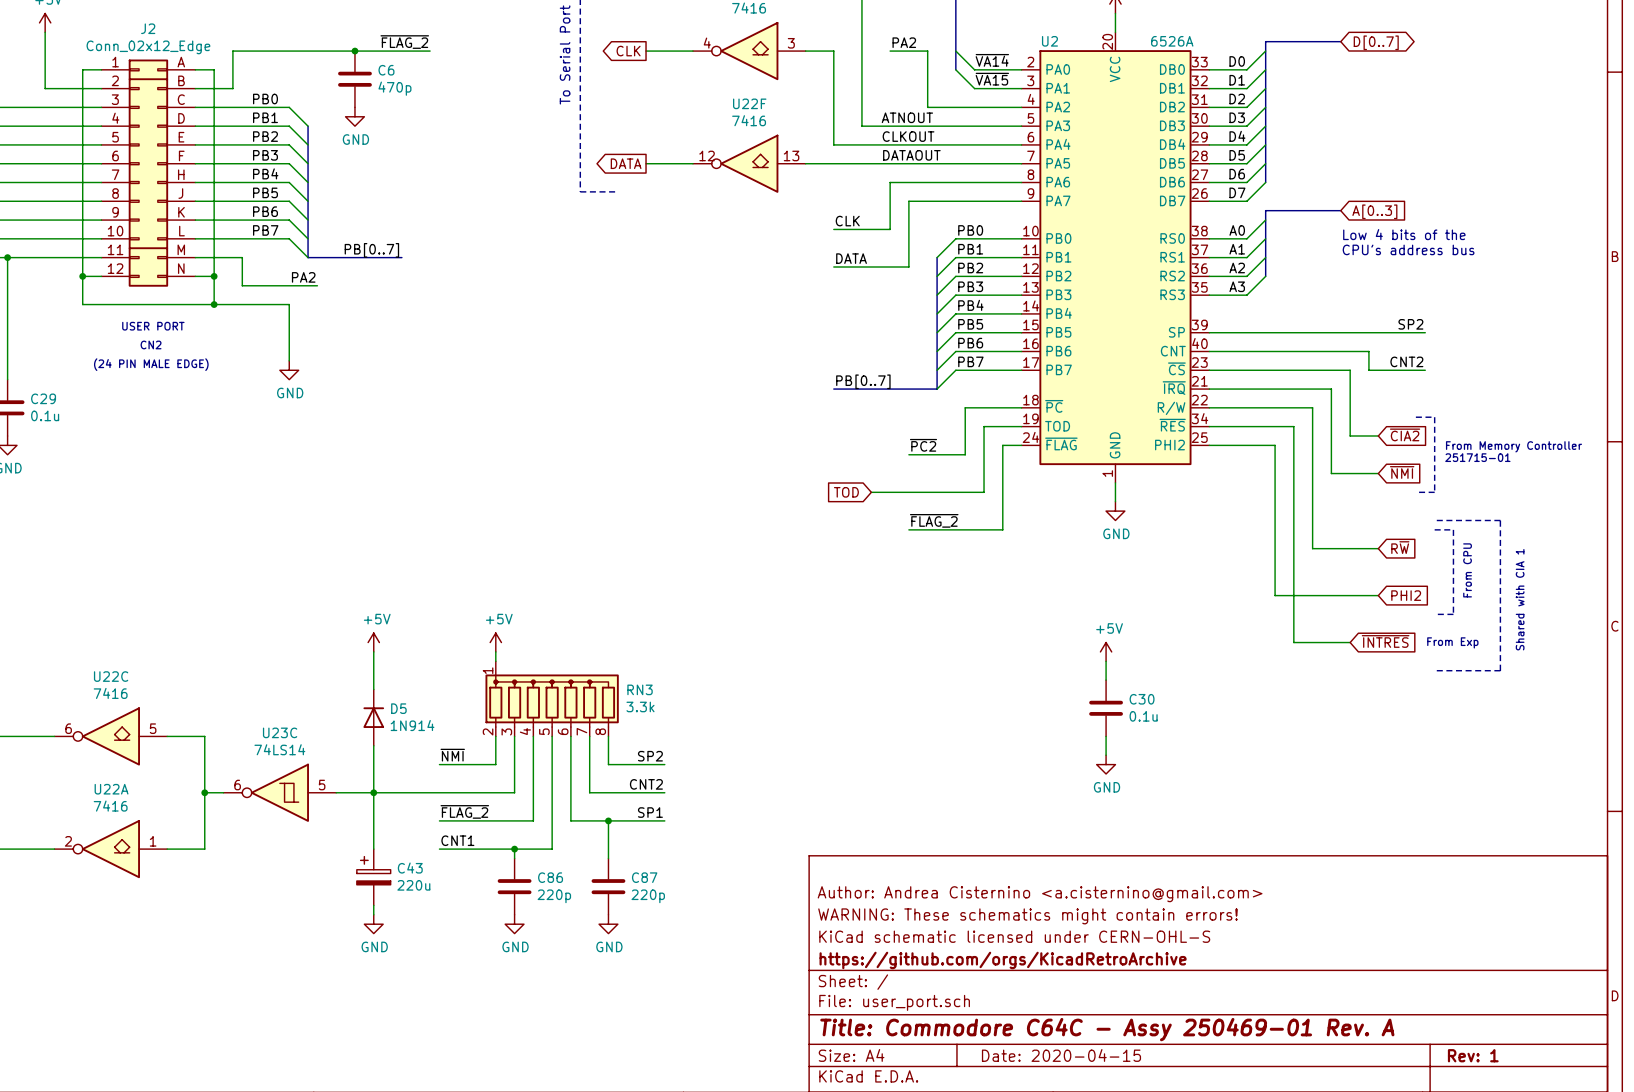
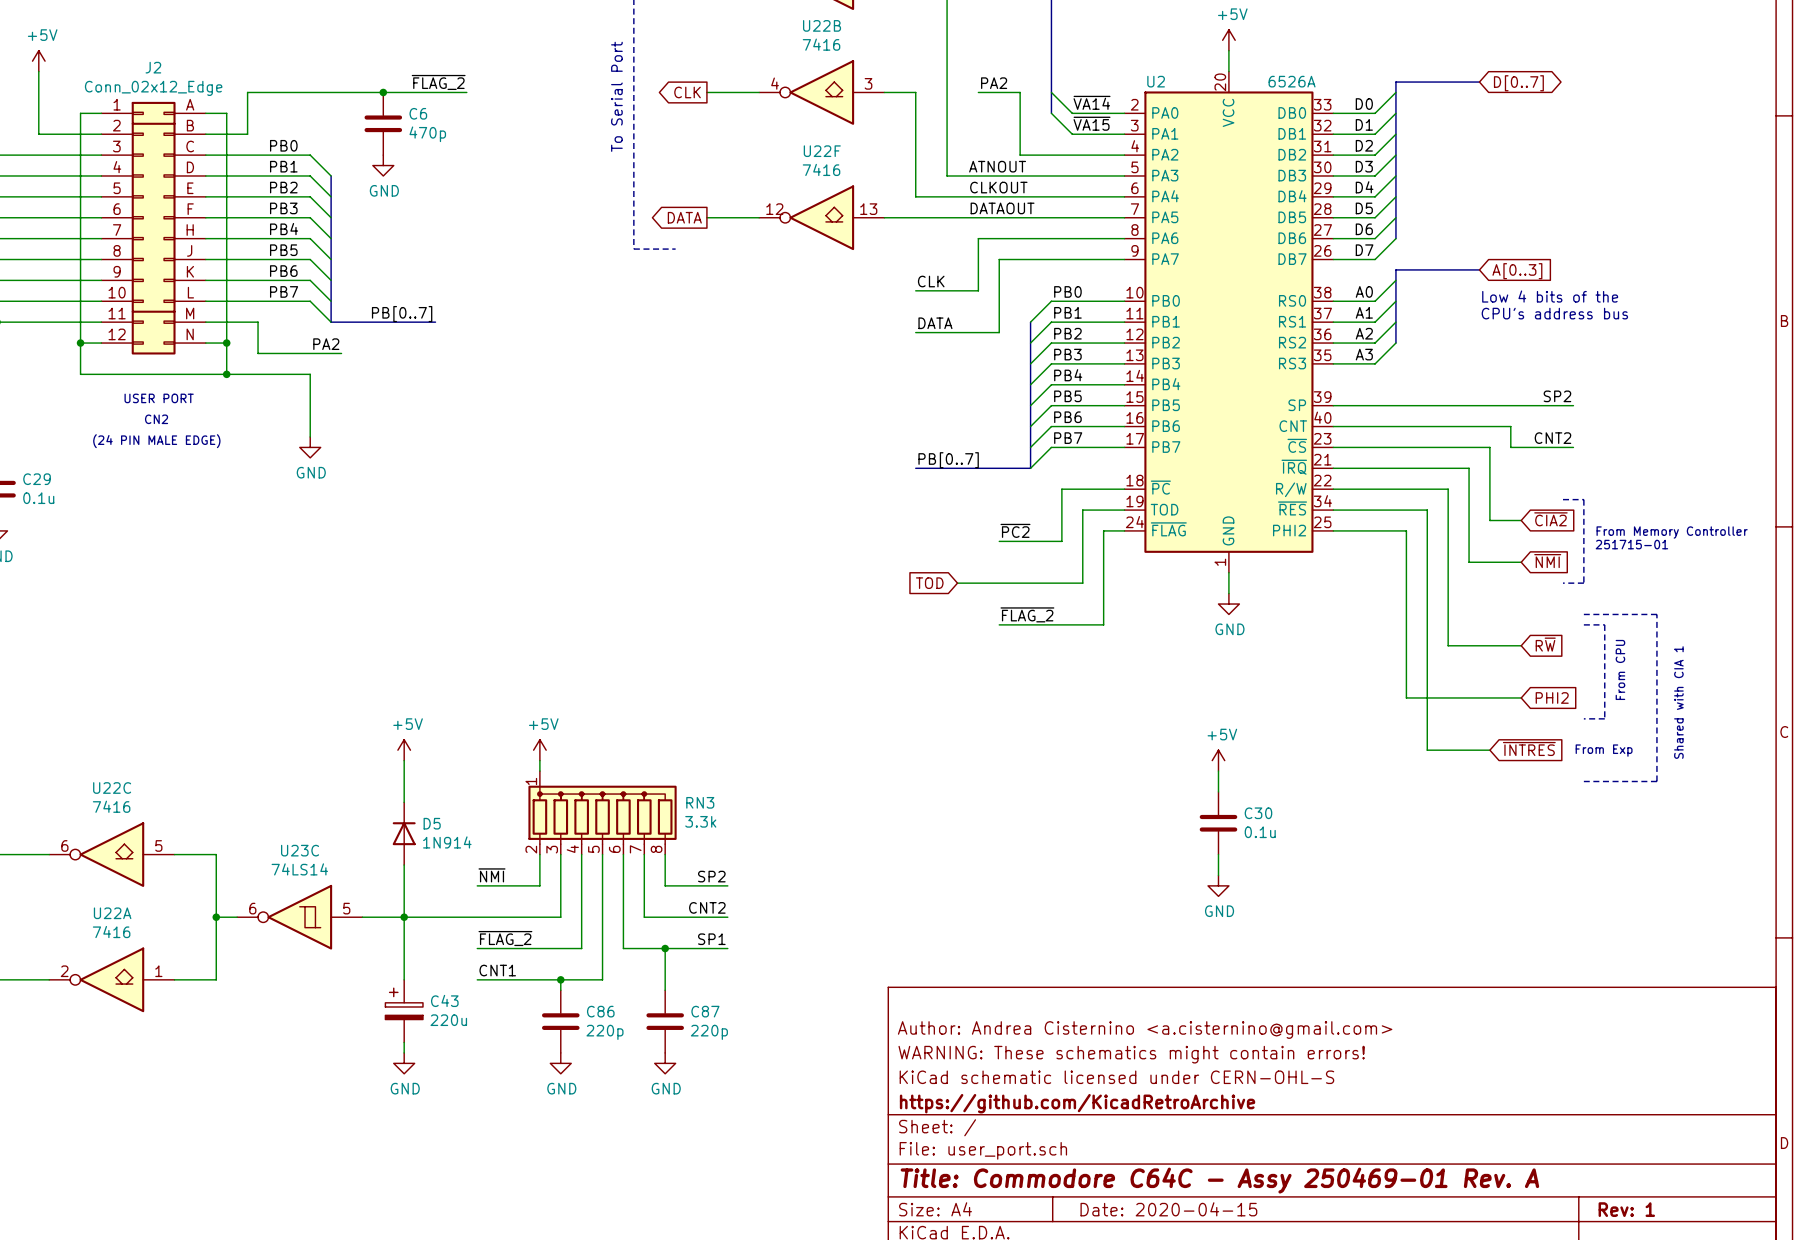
title block: https://github.com/orgs/KicadRetroArchive (1003, 960) -> https://github.com/KicadRetroArchive (1077, 1103)

